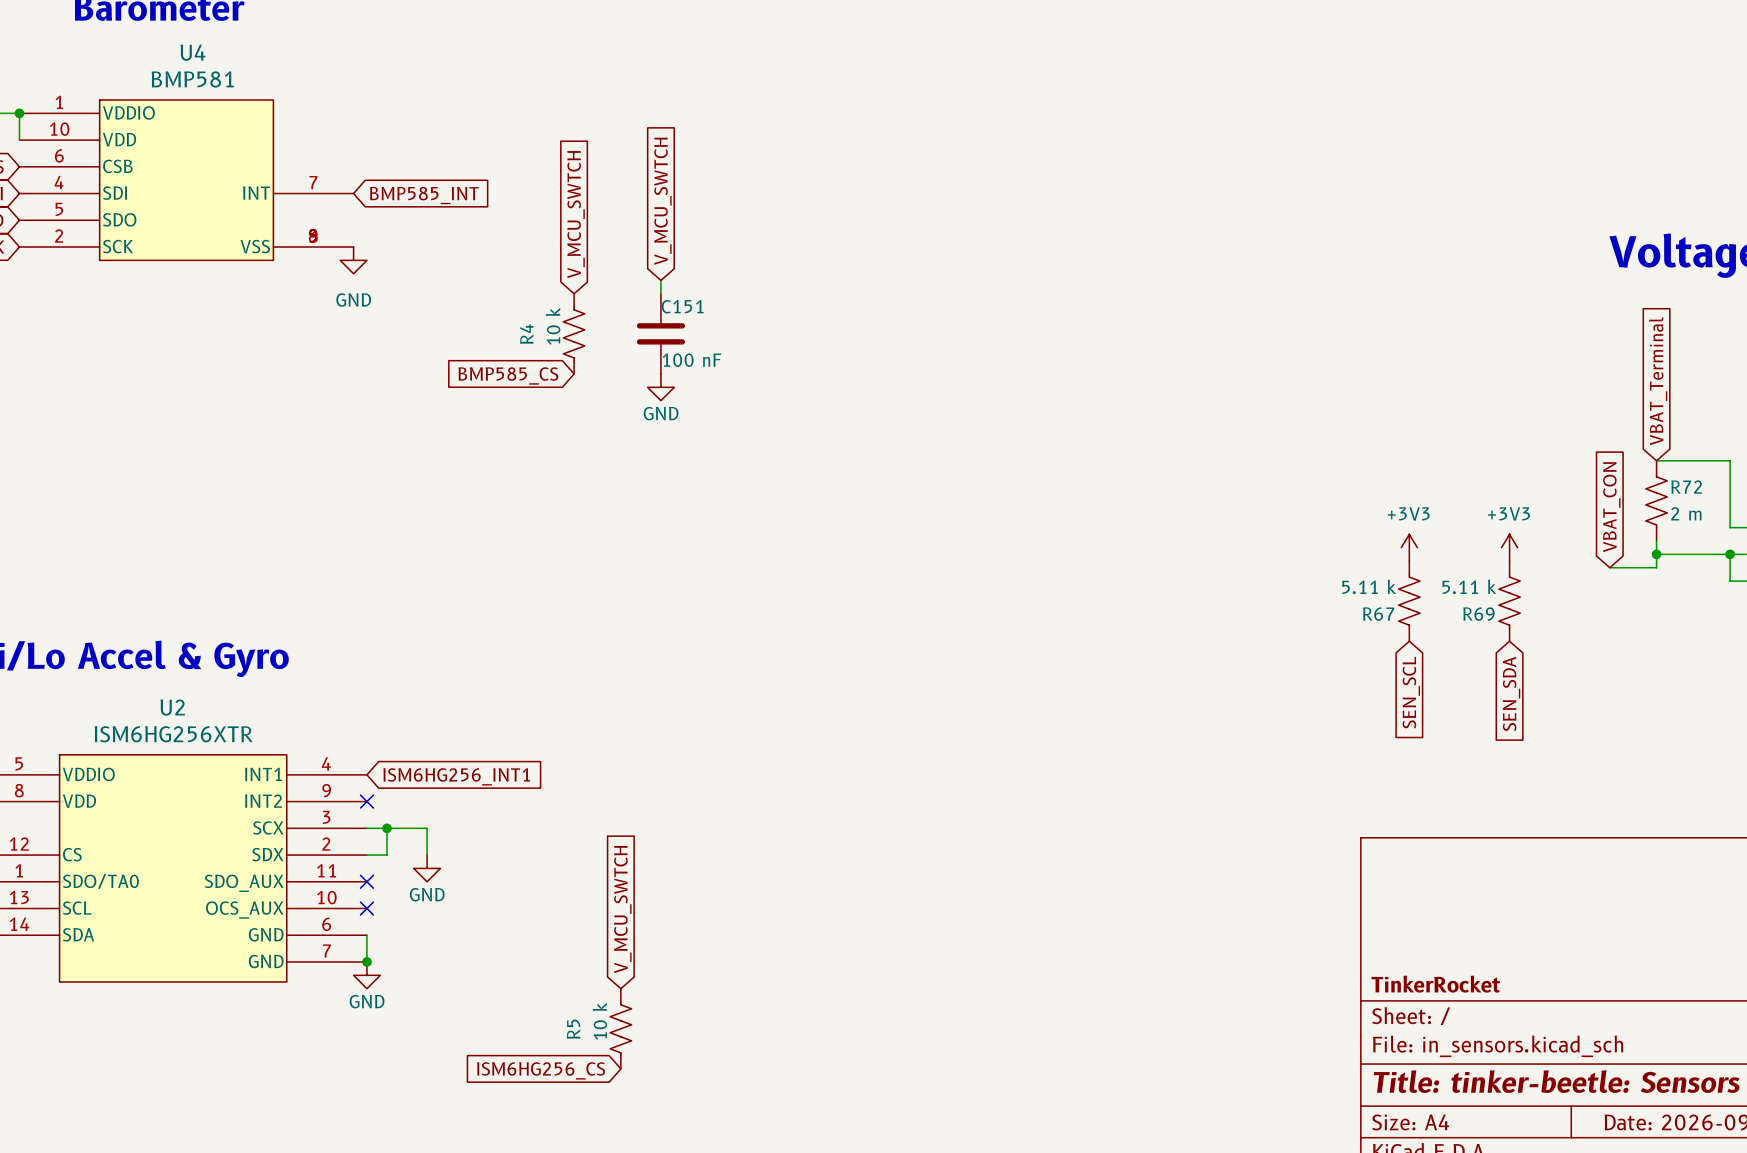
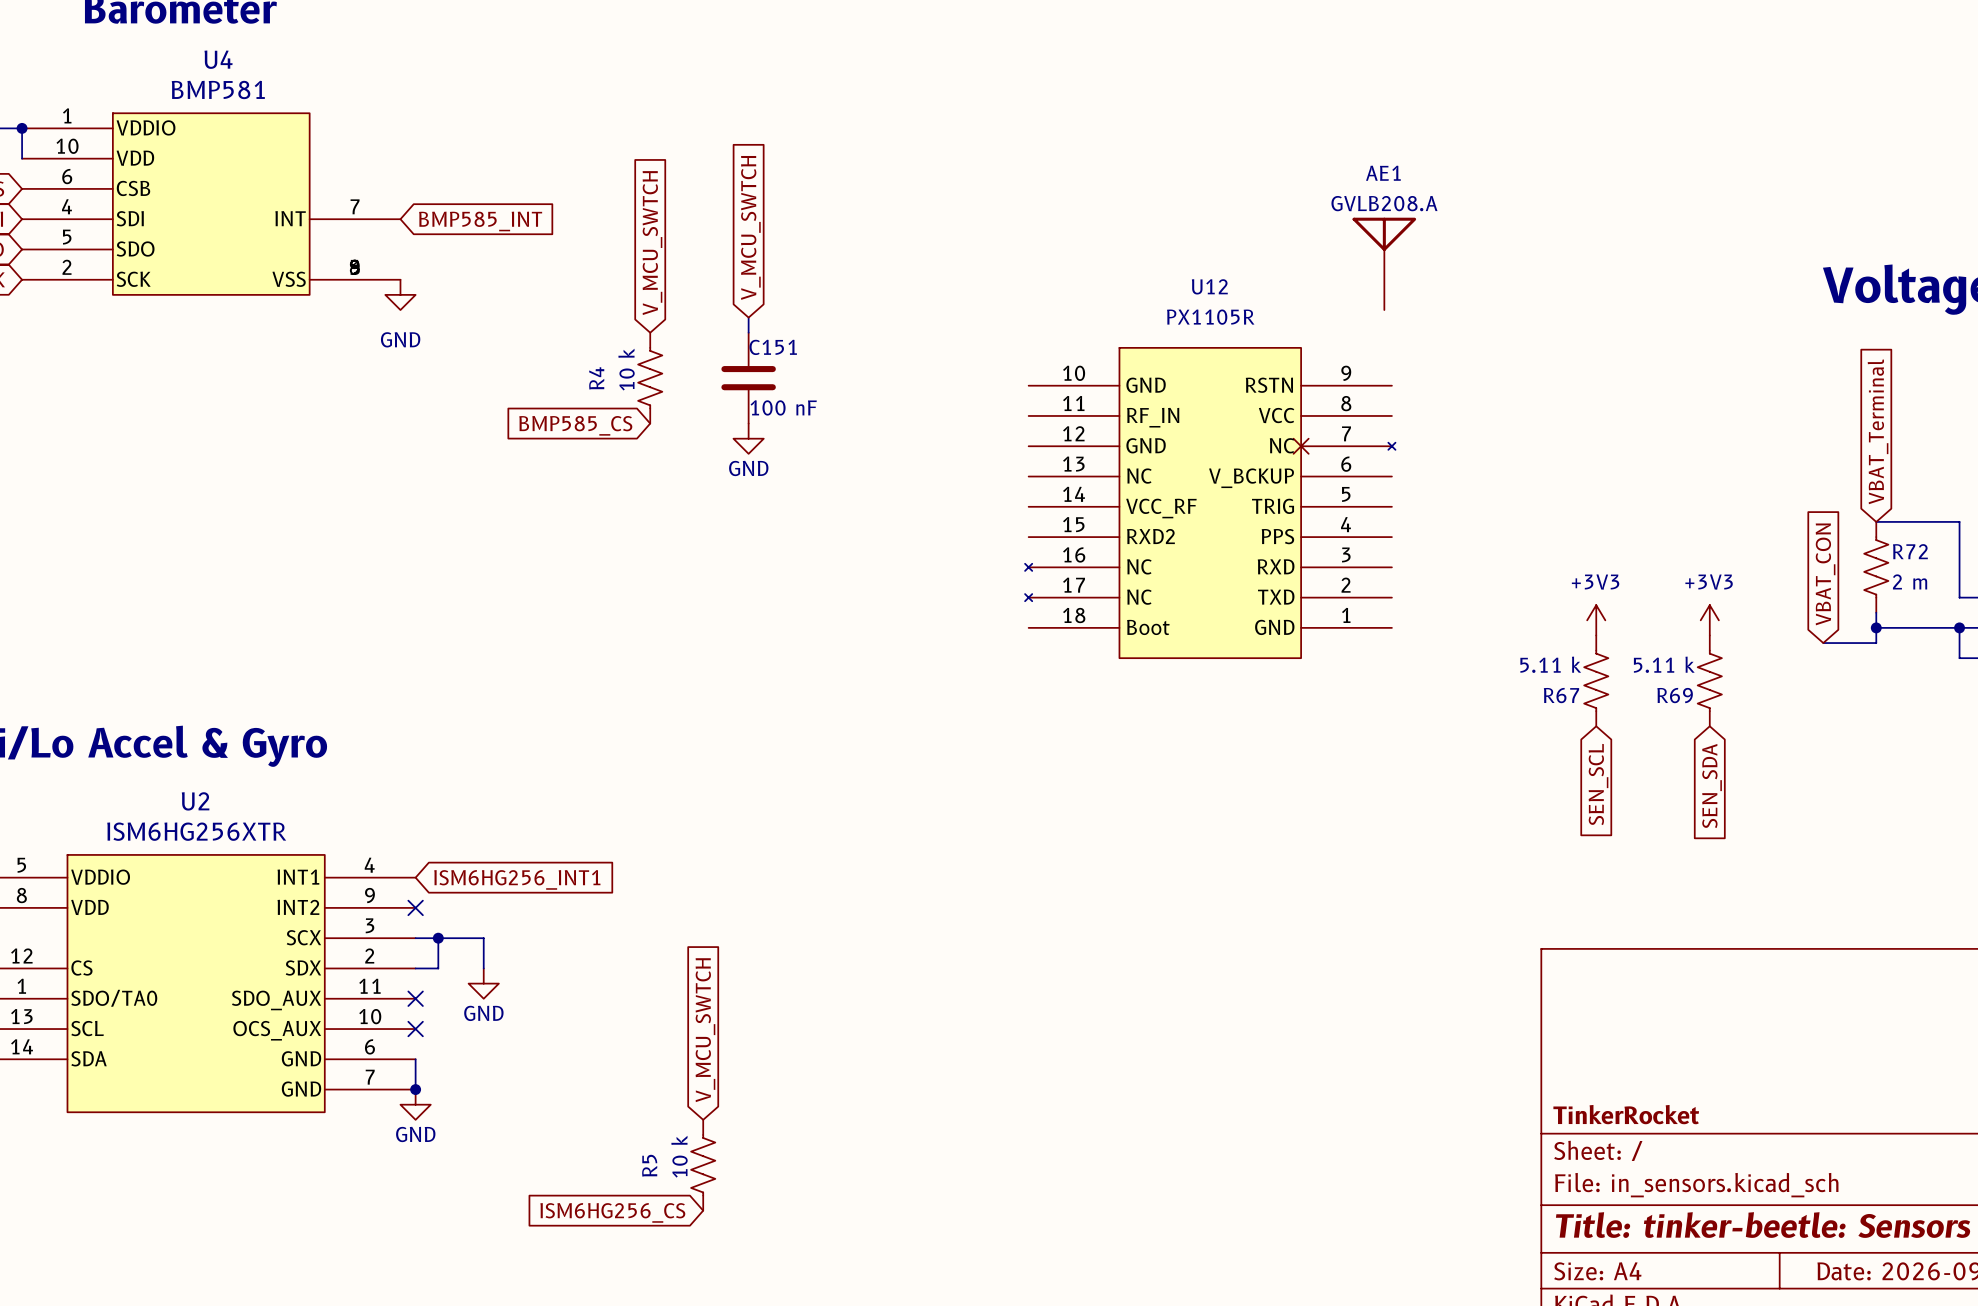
AE1: none -> GVLB208.A (1384, 263)
U12: none -> PX1105R (1210, 503)

